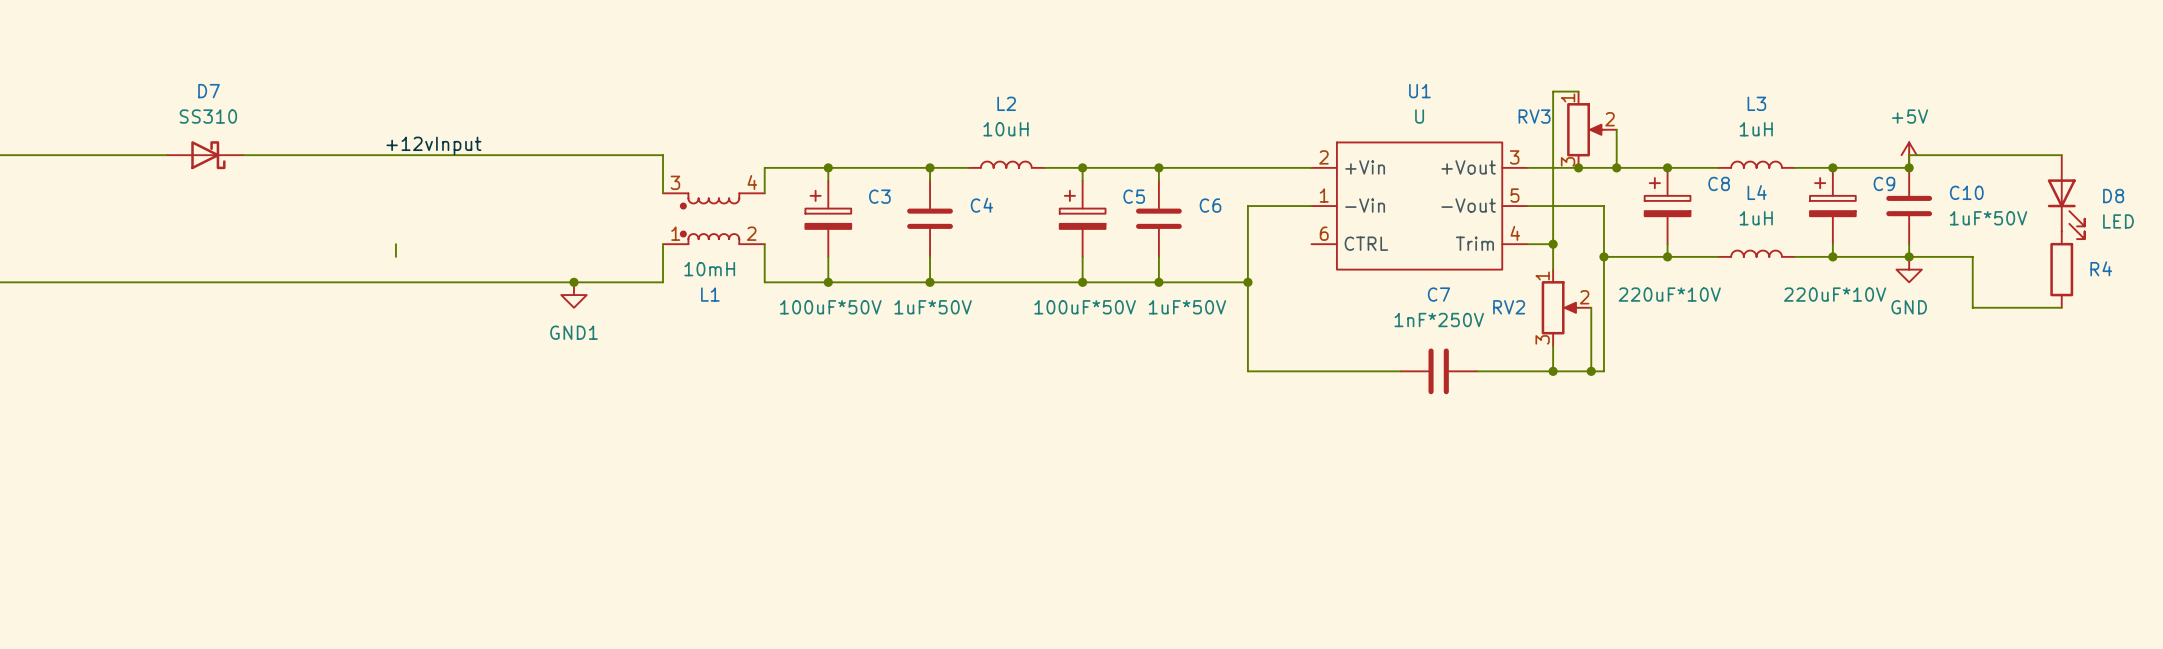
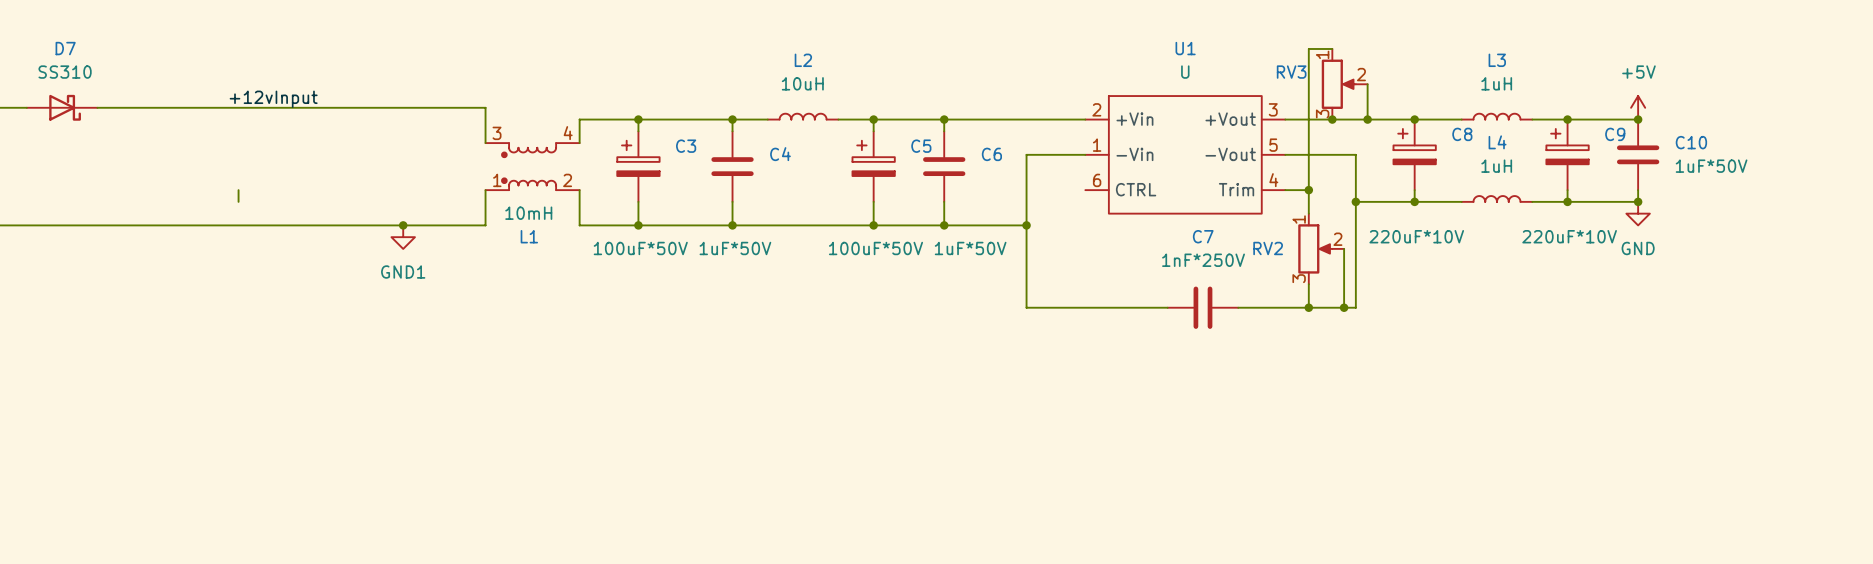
wire: (2061, 155) (1909, 155) (1909, 167) -> none
D8: LED (2066, 197) -> none
wire: (1909, 256) (1972, 256) (1972, 307) (2061, 307) -> none
R4: (2061, 269) -> none

